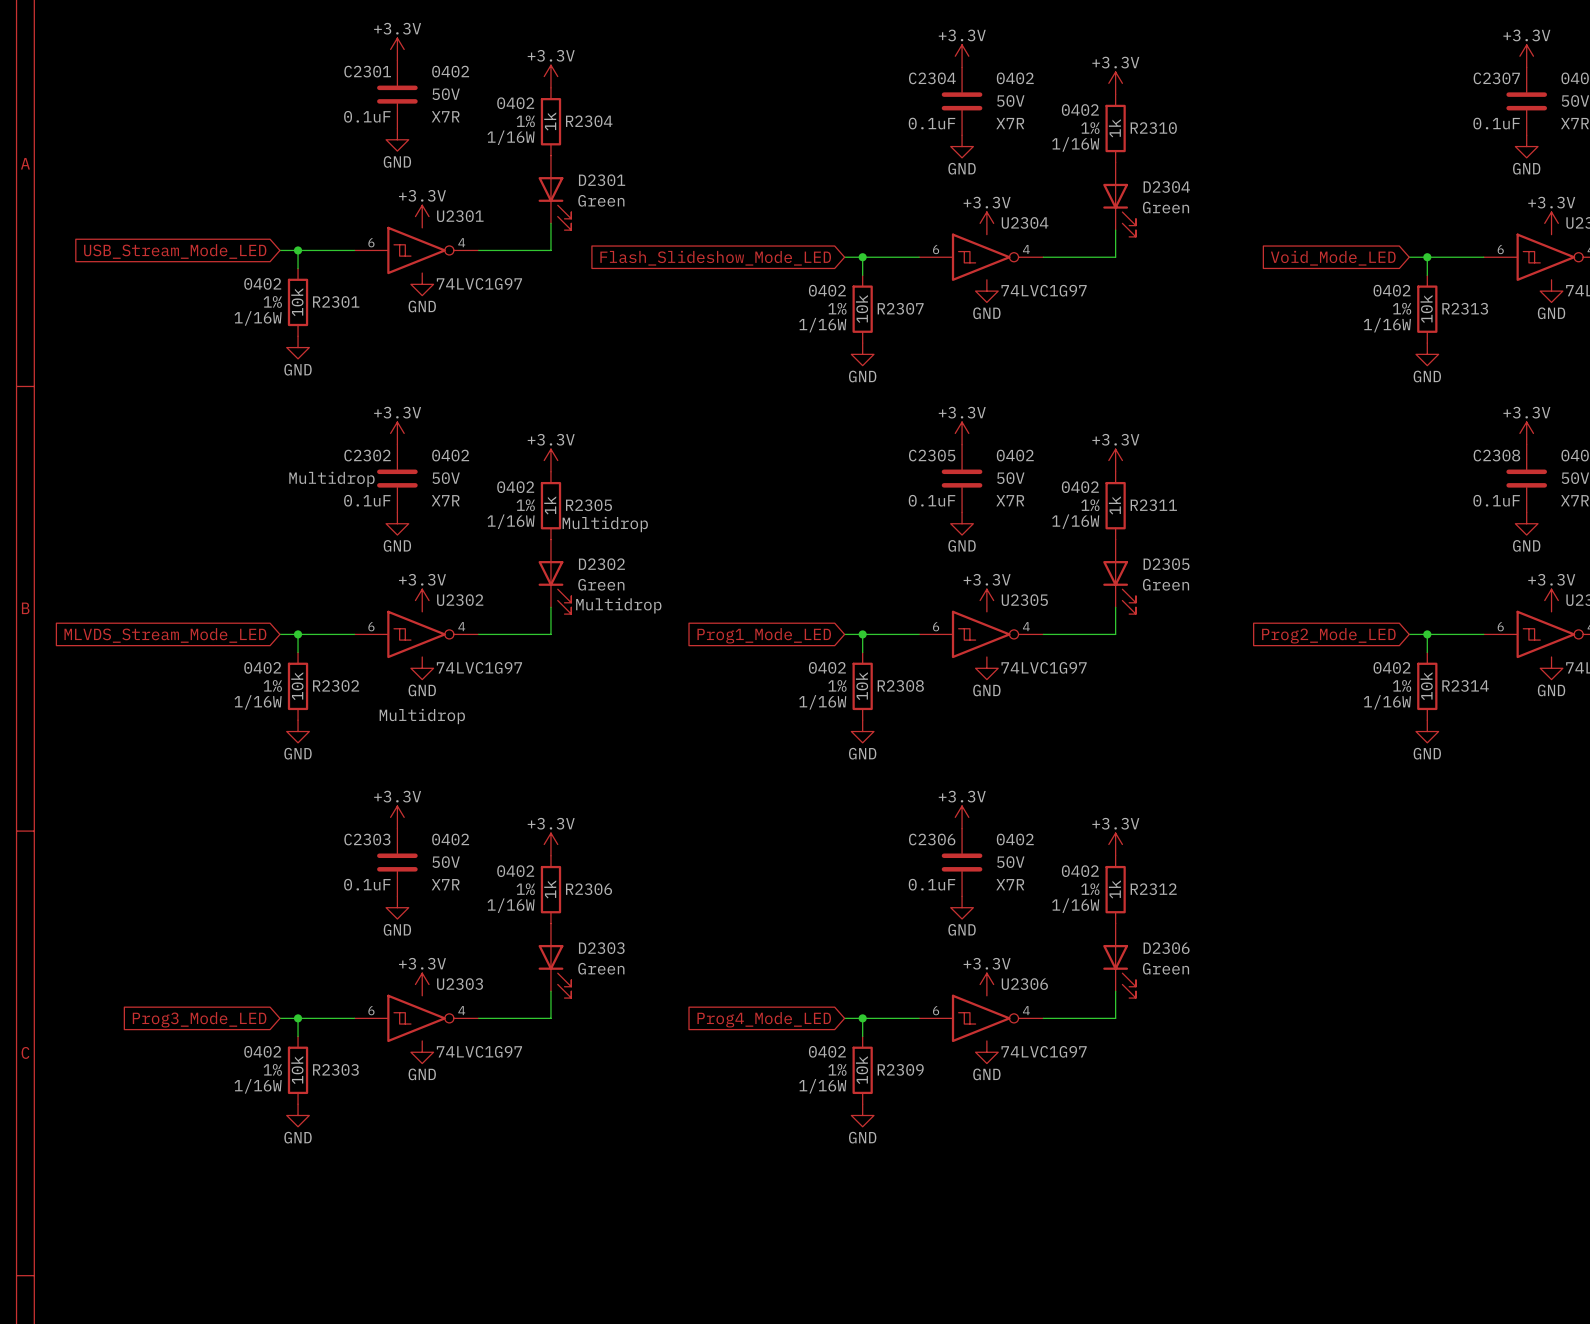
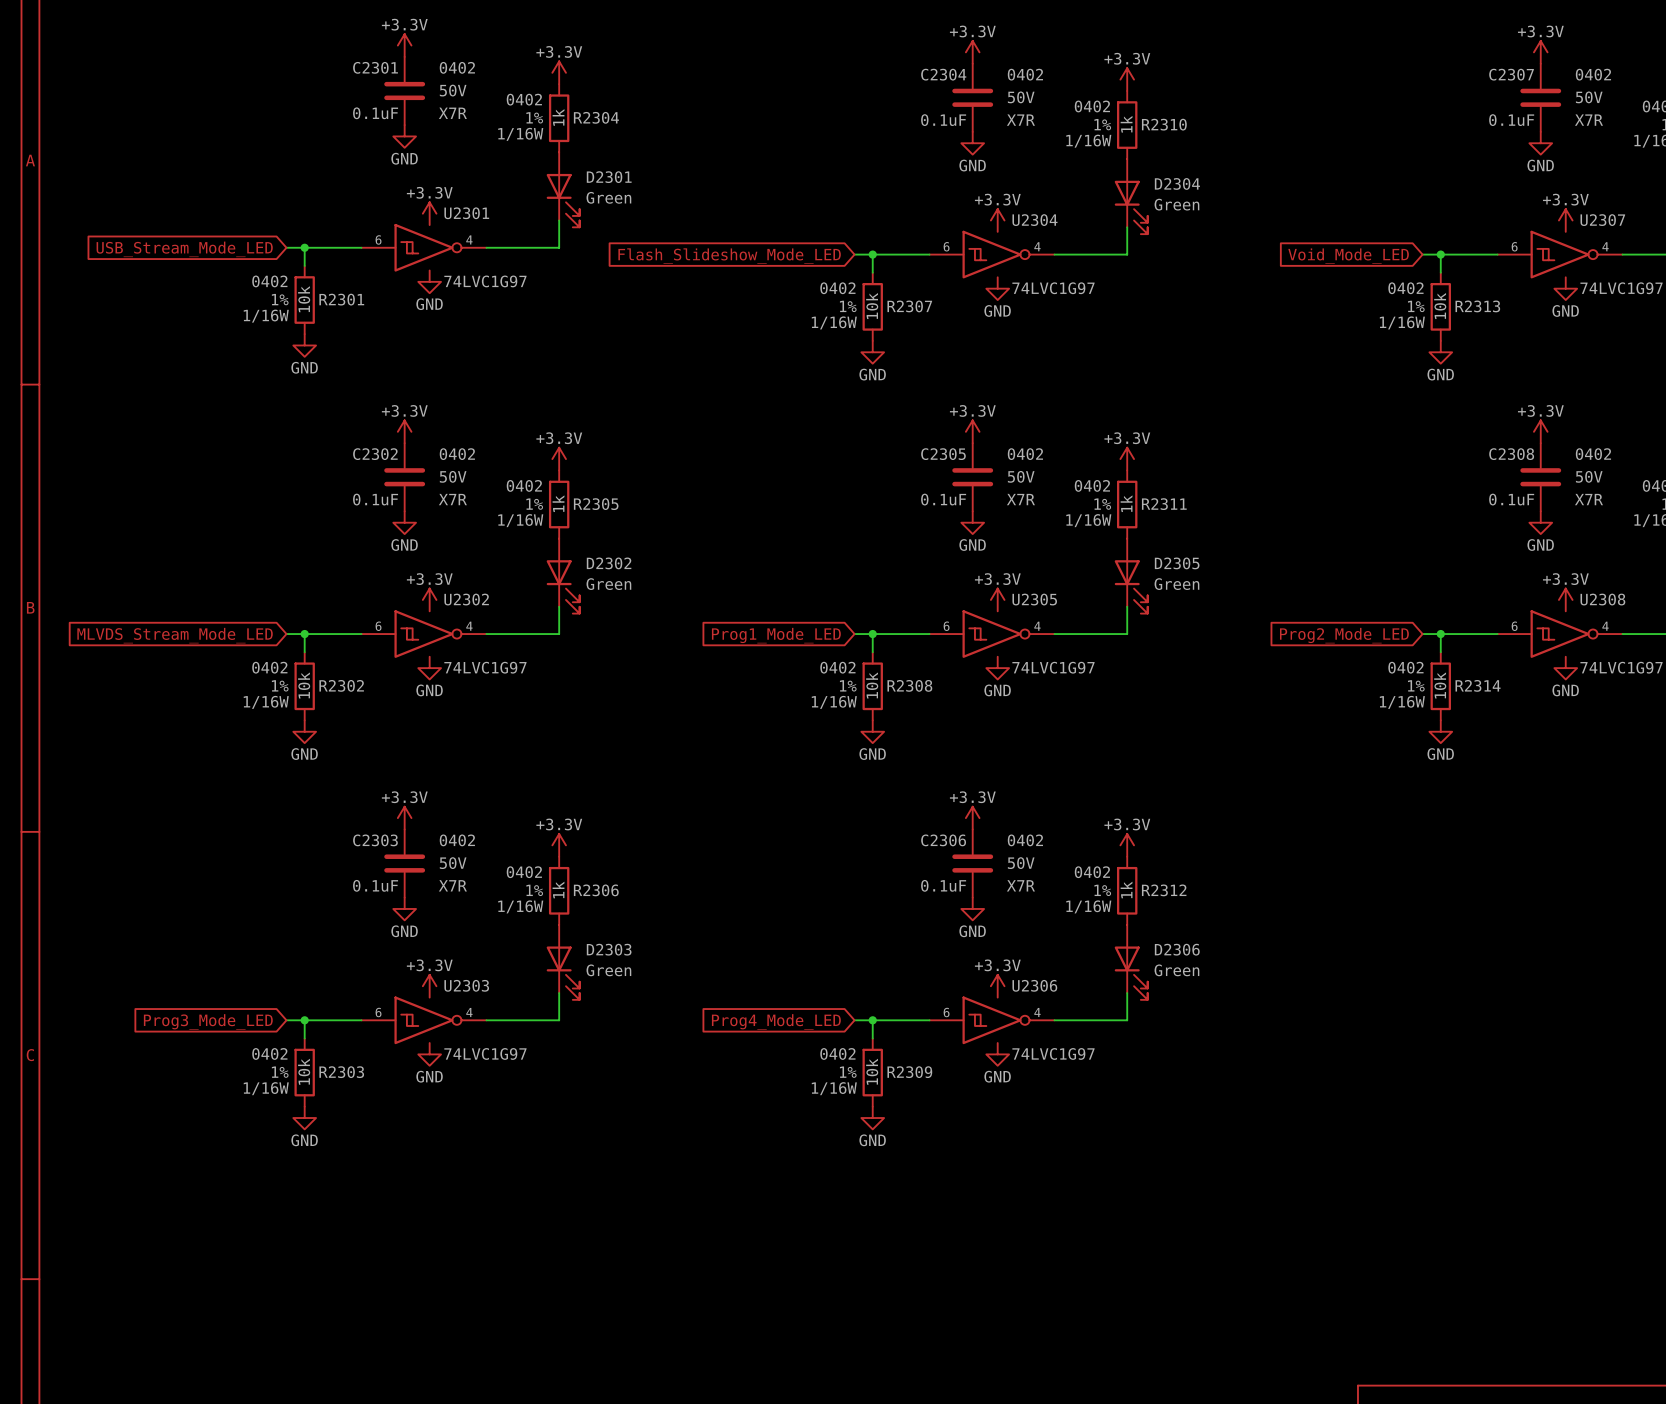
C2302 text: Multidrop (331, 479) -> none
R2305 text: Multidrop (605, 524) -> none
D2302 text: Multidrop (618, 605) -> none
U2302 text: Multidrop (422, 716) -> none

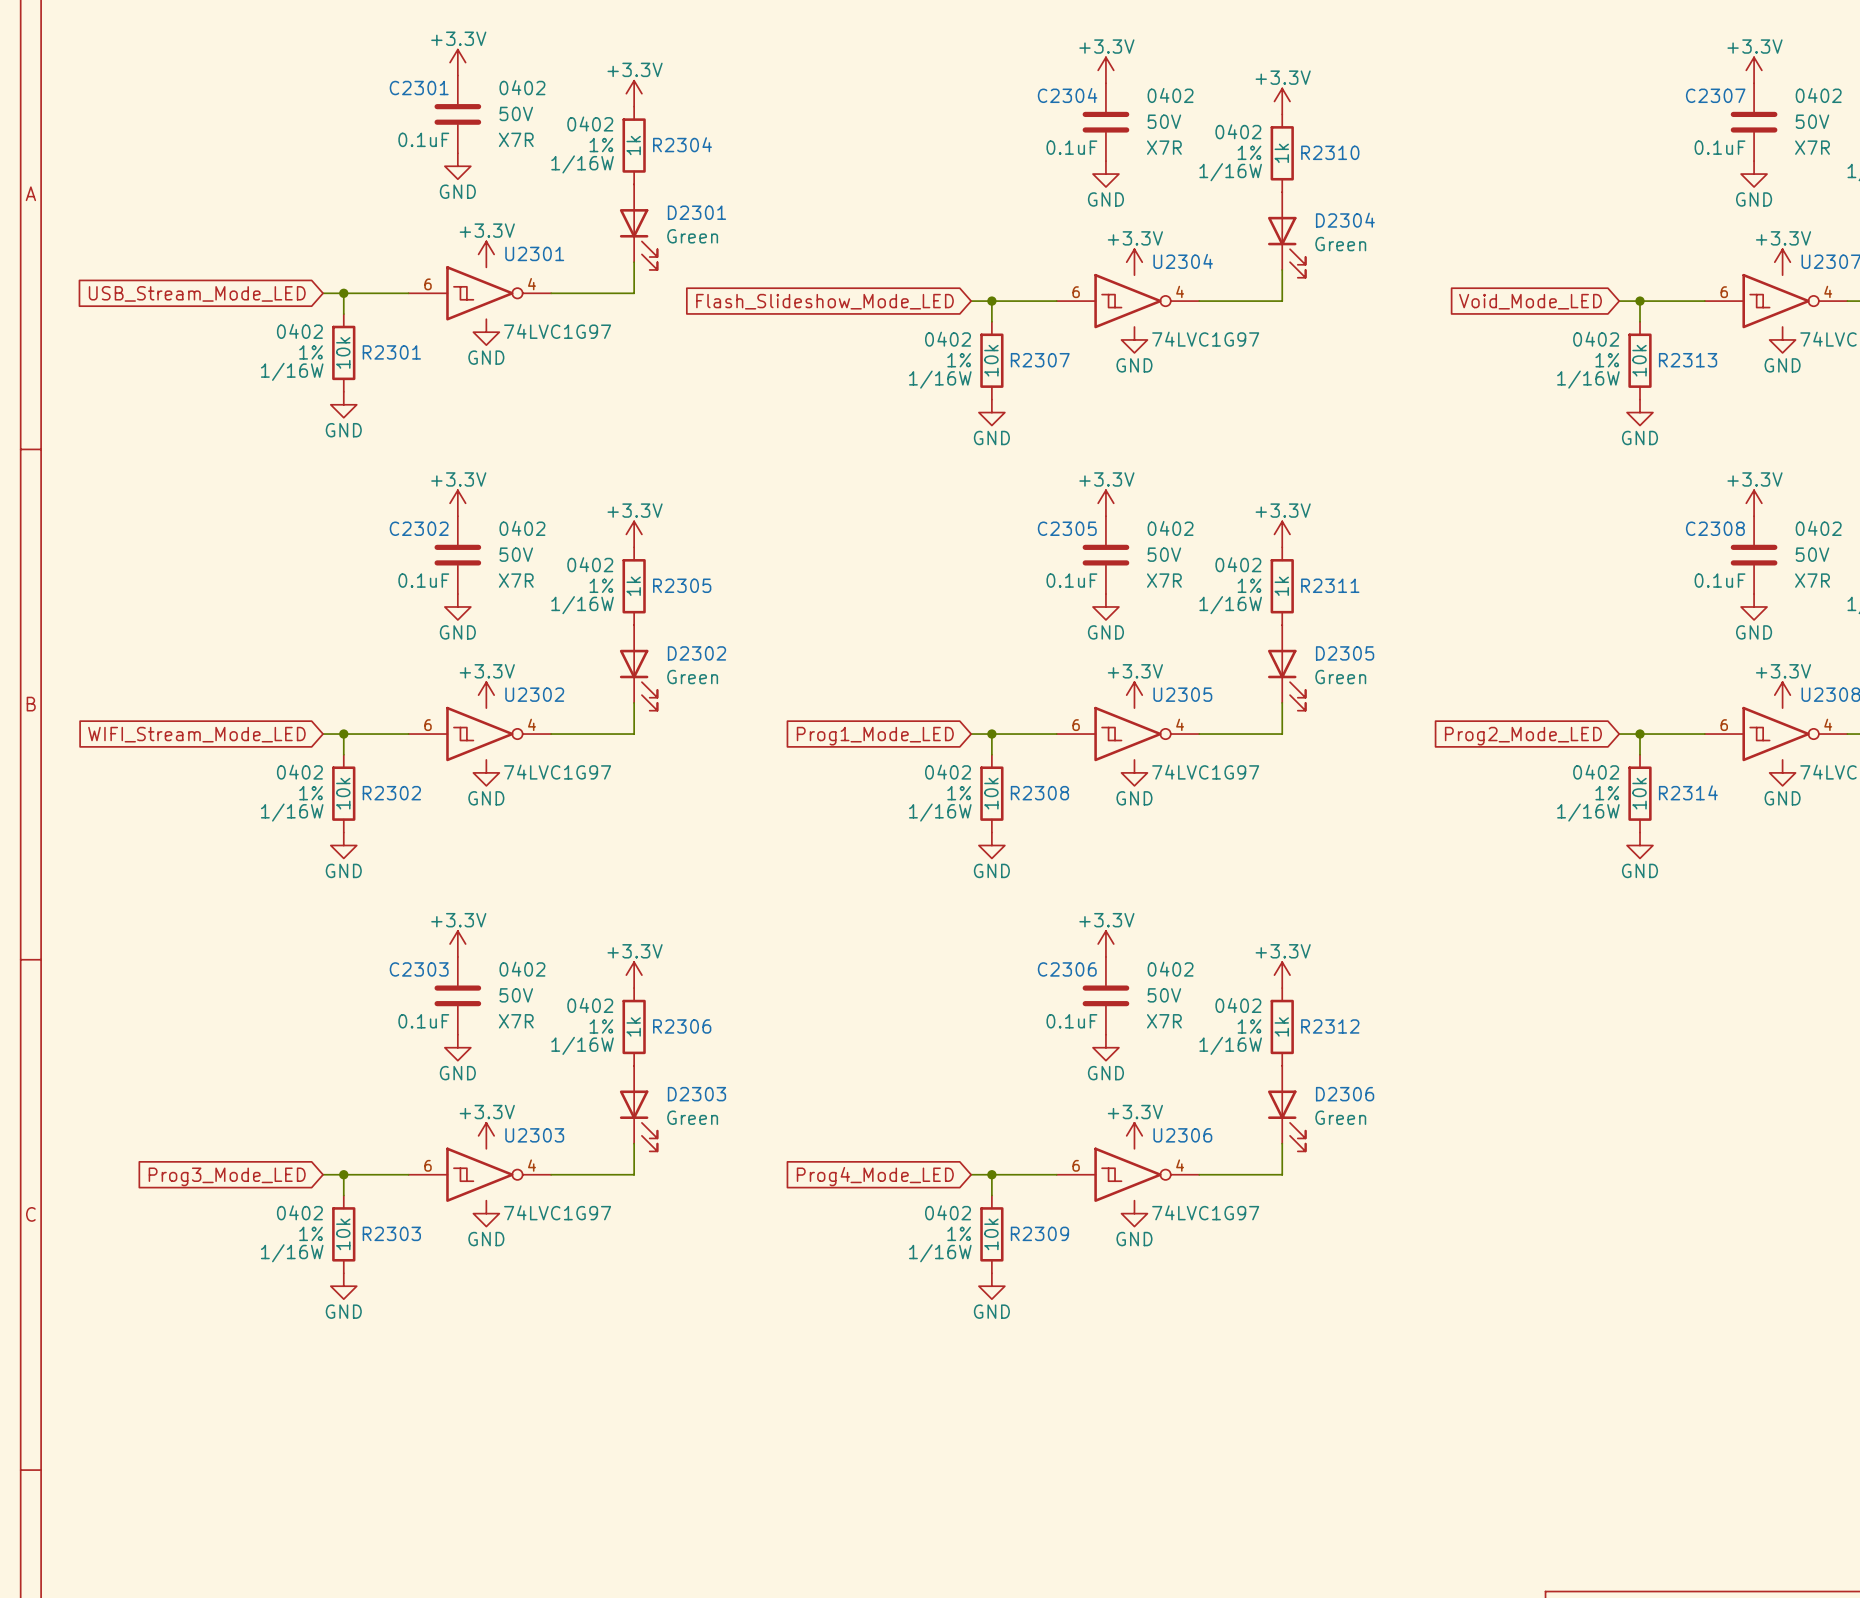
global label: MLVDS_Stream_Mode_LED (175, 635) -> WIFI_Stream_Mode_LED (196, 734)

